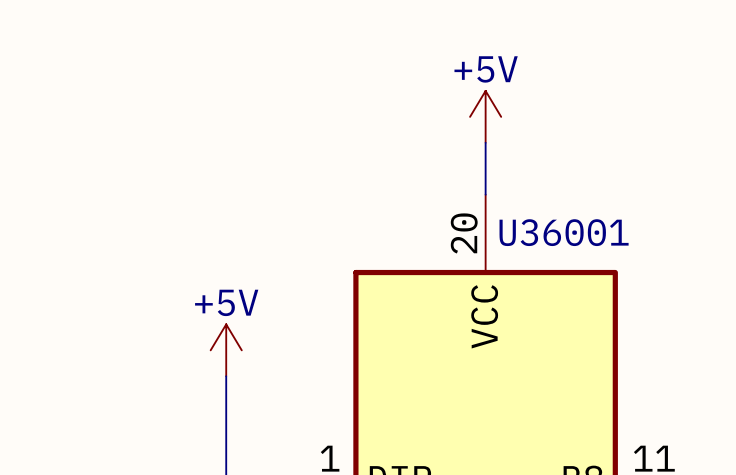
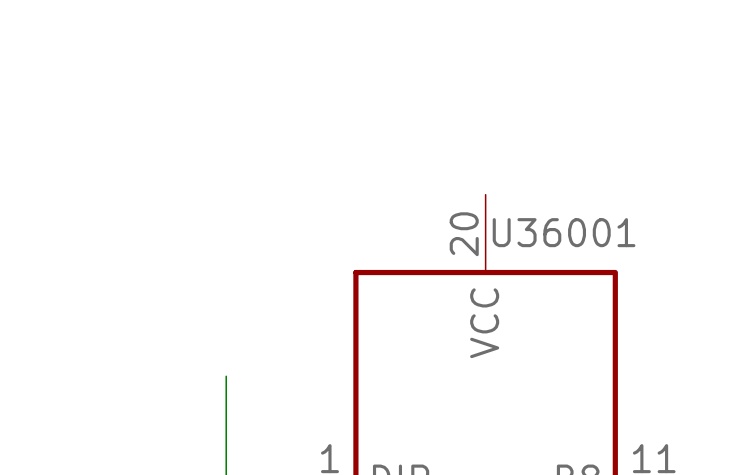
power symbol: +5V (485, 116) -> none
wire: (485, 142) (485, 194) -> none
power symbol: +5V (226, 350) -> none

